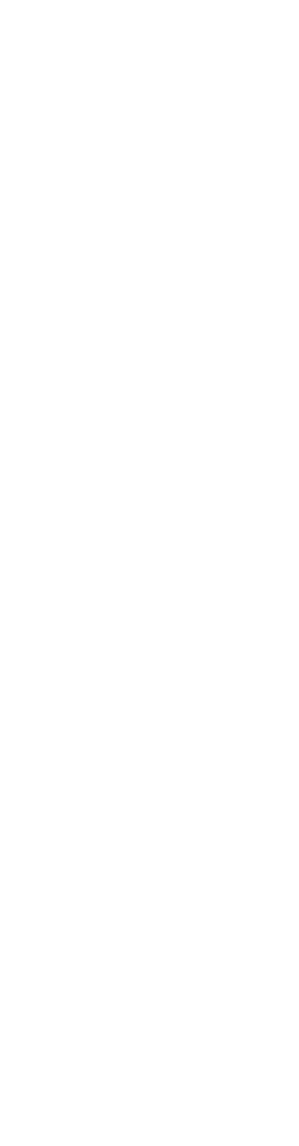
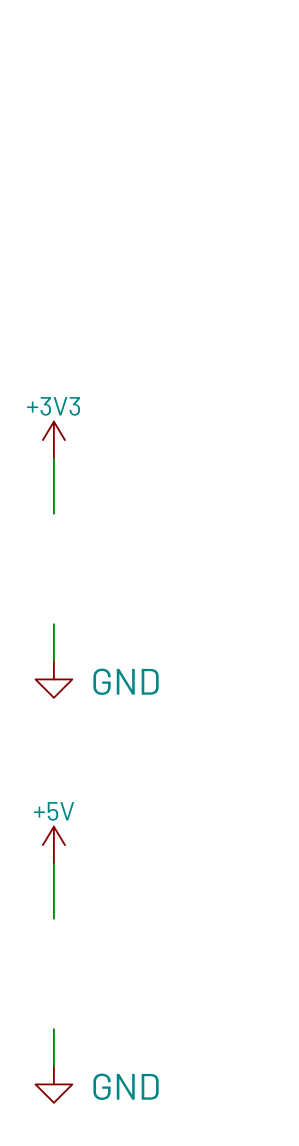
power symbol: none -> +3V3 (53, 440)
wire: none -> (53, 458) (53, 513)
wire: none -> (53, 624) (53, 661)
power symbol: none -> GND (53, 679)
power symbol: none -> +5V (53, 845)
wire: none -> (53, 863) (53, 918)
wire: none -> (53, 1029) (53, 1066)
power symbol: none -> GND (53, 1084)

